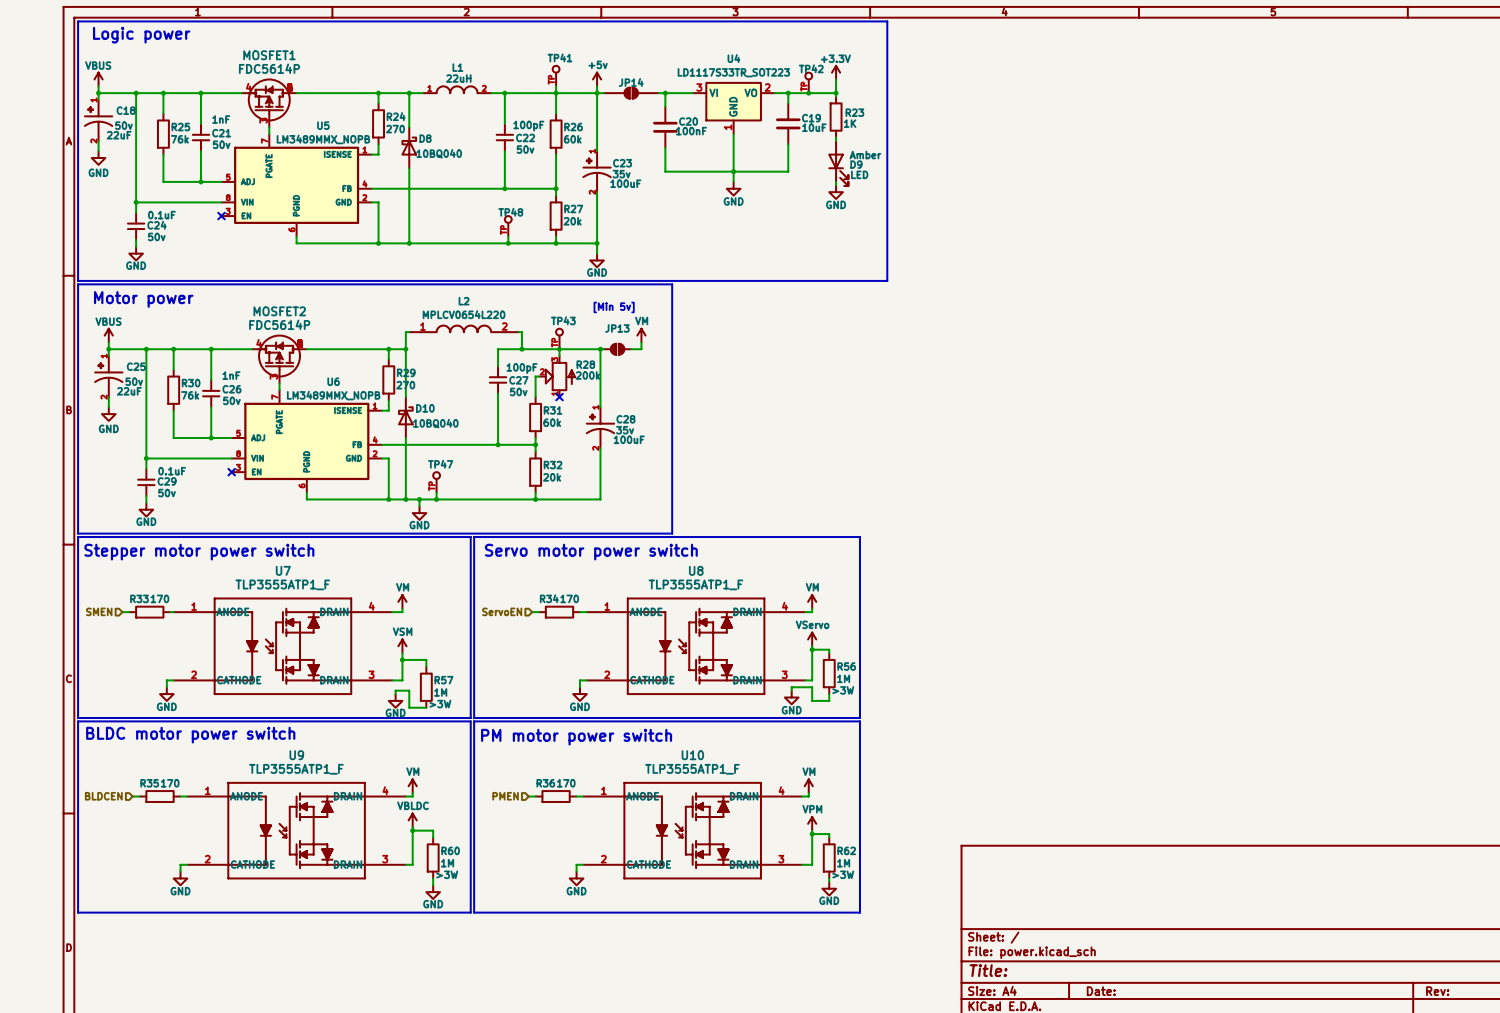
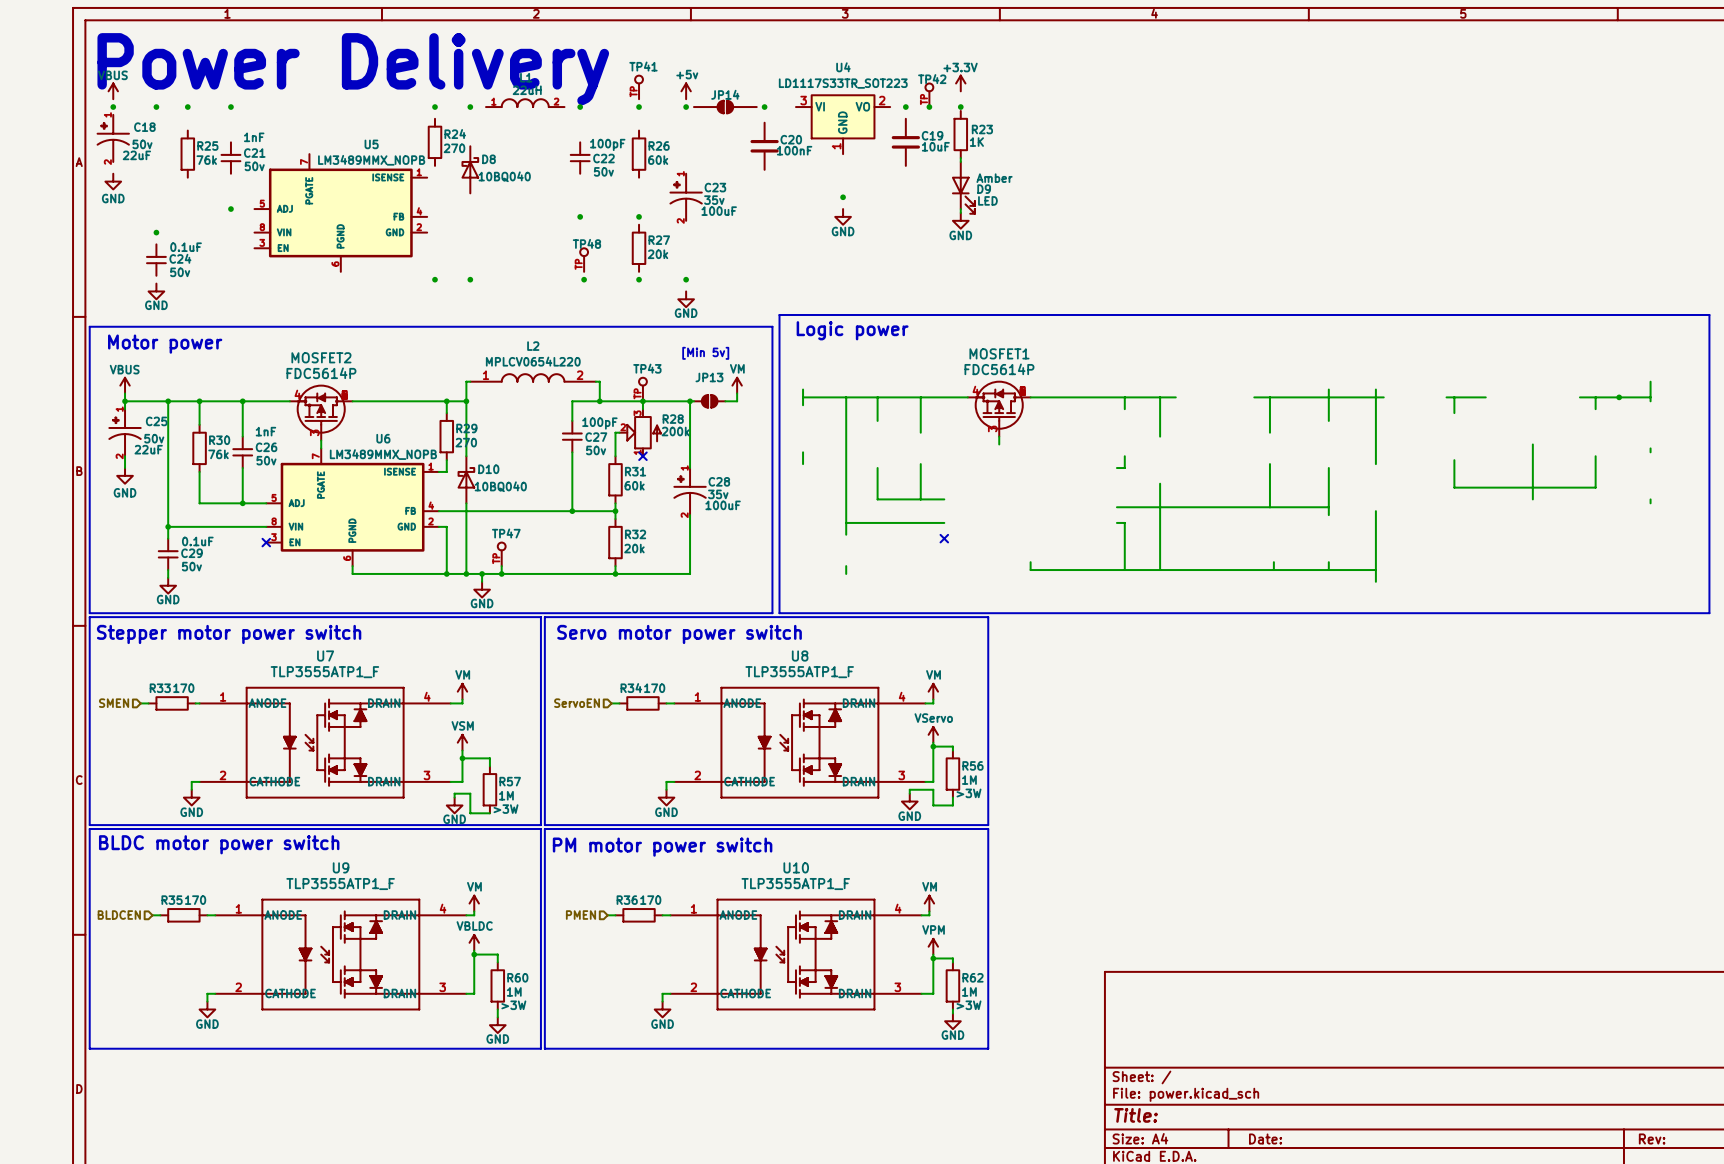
line: (78, 21) (887, 21) (887, 280) (78, 280) (78, 21) -> none
text: Logic power (141, 35) -> none
text: none -> Power Delivery (353, 69)
wire: (836, 79) (836, 96) -> none
wire: (98, 86) (98, 99) -> none
wire: (556, 86) (556, 113) -> none
wire: (597, 86) (597, 151) -> none
wire: (98, 93) (241, 93) -> none
wire: (136, 93) (136, 202) -> none
wire: (163, 93) (163, 113) -> none
wire: (200, 93) (200, 123) -> none
wire: (296, 93) (422, 93) -> none
wire: (378, 93) (378, 103) -> none
wire: (409, 93) (409, 127) -> none
wire: (491, 93) (603, 93) -> none
wire: (504, 93) (504, 123) -> none
wire: (658, 93) (692, 93) -> none
wire: (665, 93) (665, 106) -> none
wire: (774, 93) (836, 93) -> none
wire: (788, 93) (788, 103) -> none
MOSFET1 position: (269, 103) -> (999, 408)
wire: (269, 127) (269, 134) -> none
wire: (733, 134) (733, 181) -> none
wire: (98, 140) (98, 151) -> none
wire: (378, 144) (378, 154) (371, 154) -> none
wire: (788, 144) (788, 171) (665, 171) (665, 147) -> none
wire: (200, 151) (200, 181) -> none
wire: (504, 151) (504, 188) -> none
wire: (163, 154) (163, 181) (221, 181) -> none
wire: (556, 154) (556, 195) -> none
wire: (409, 168) (409, 243) -> none
wire: (371, 188) (556, 188) -> none
wire: (597, 192) (597, 253) -> none
wire: (136, 202) (221, 202) -> none
wire: (136, 202) (136, 212) -> none
wire: (371, 202) (378, 202) (378, 243) -> none
no-connect mark: (221, 216) -> none
wire: (296, 236) (296, 243) (597, 243) -> none
wire: (508, 236) (508, 243) -> none
wire: (556, 236) (556, 243) -> none
wire: (136, 239) (136, 246) -> none
line: none -> (779, 314) (1709, 314) (1709, 613) (779, 613) (779, 314)
text: none -> Logic power (852, 330)
wire: none -> (1650, 381) (1650, 401)
wire: none -> (803, 389) (803, 405)
wire: none -> (1328, 389) (1328, 420)
wire: none -> (1375, 389) (1375, 464)
wire: none -> (803, 397) (967, 397)
wire: none -> (846, 397) (846, 534)
wire: none -> (877, 397) (877, 420)
wire: none -> (920, 397) (920, 432)
wire: none -> (1030, 397) (1175, 397)
wire: none -> (1124, 397) (1124, 409)
wire: none -> (1160, 397) (1160, 436)
wire: none -> (1254, 397) (1383, 397)
wire: none -> (1269, 397) (1269, 432)
wire: none -> (1446, 397) (1485, 397)
wire: none -> (1454, 397) (1454, 413)
wire: none -> (1579, 397) (1650, 397)
wire: none -> (1595, 397) (1595, 409)
junction: none -> (1619, 397)
wire: none -> (999, 436) (999, 444)
wire: none -> (1532, 444) (1532, 499)
wire: none -> (1650, 448) (1650, 452)
wire: none -> (803, 452) (803, 464)
wire: none -> (1124, 456) (1124, 468) (1116, 468)
wire: none -> (1595, 456) (1595, 487) (1454, 487) (1454, 460)
wire: none -> (920, 464) (920, 499)
wire: none -> (1269, 464) (1269, 507)
wire: none -> (877, 468) (877, 499) (944, 499)
wire: none -> (1328, 468) (1328, 515)
wire: none -> (1160, 483) (1160, 570)
wire: none -> (1650, 499) (1650, 503)
wire: none -> (1116, 507) (1328, 507)
wire: none -> (1375, 511) (1375, 581)
wire: none -> (846, 522) (944, 522)
wire: none -> (1116, 522) (1124, 522) (1124, 570)
no-connect mark: none -> (944, 538)
wire: none -> (1030, 562) (1030, 570) (1375, 570)
wire: none -> (1273, 562) (1273, 570)
wire: none -> (1328, 562) (1328, 570)
wire: none -> (846, 566) (846, 573)

